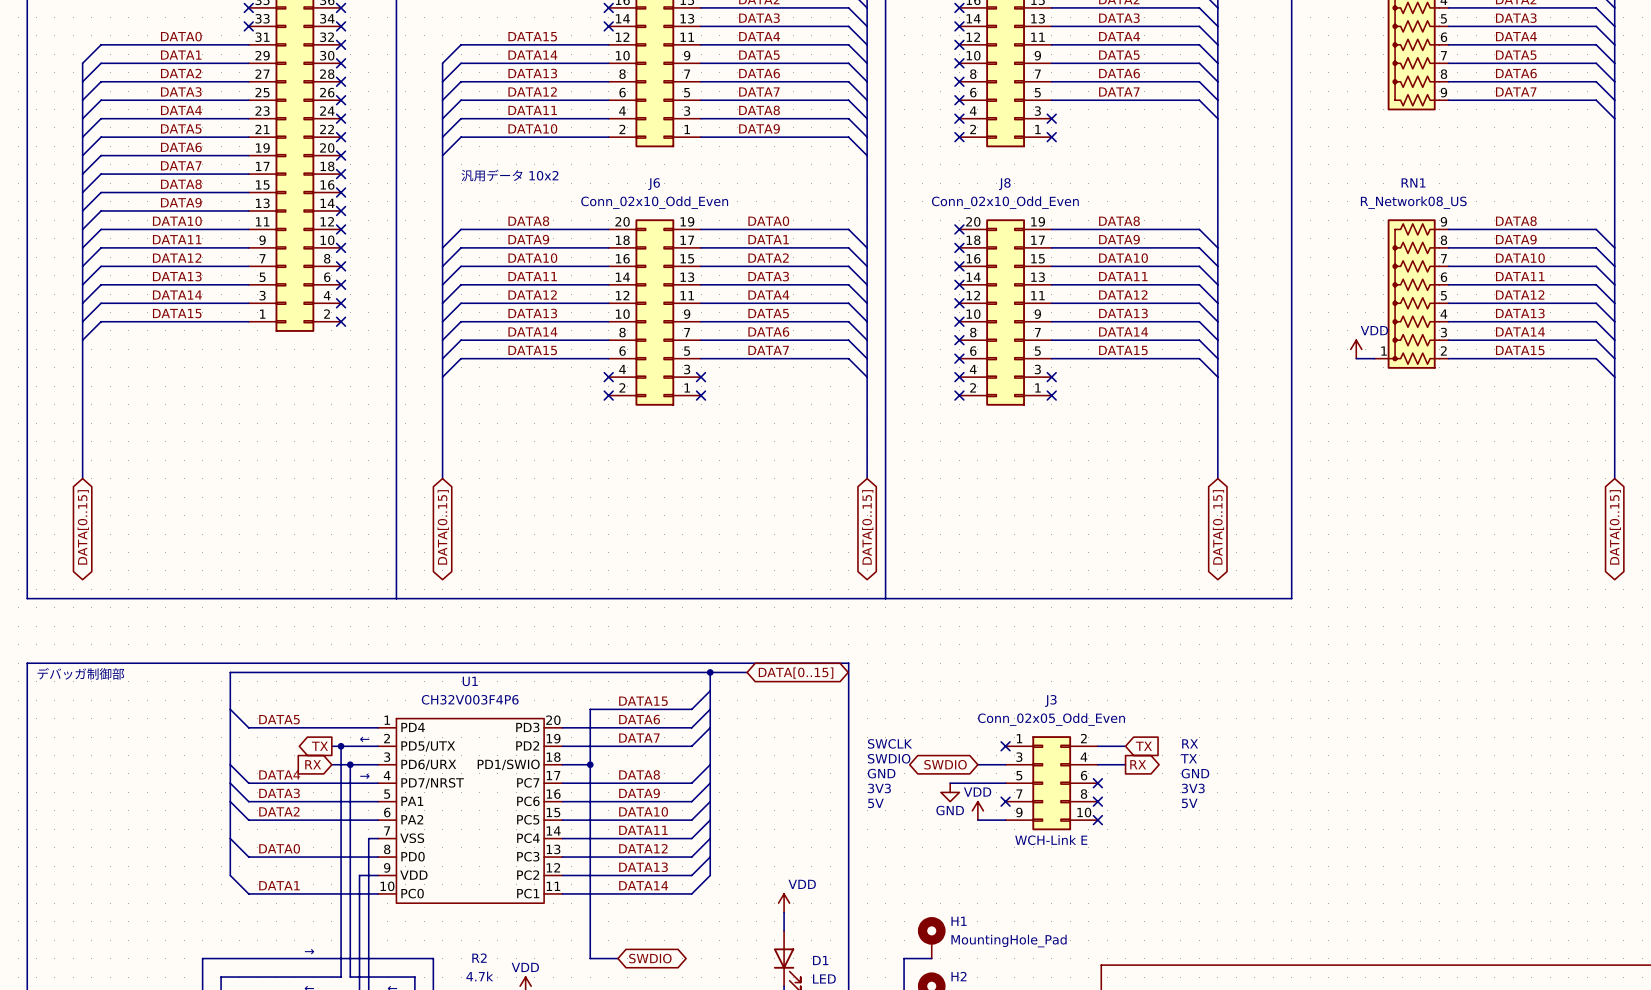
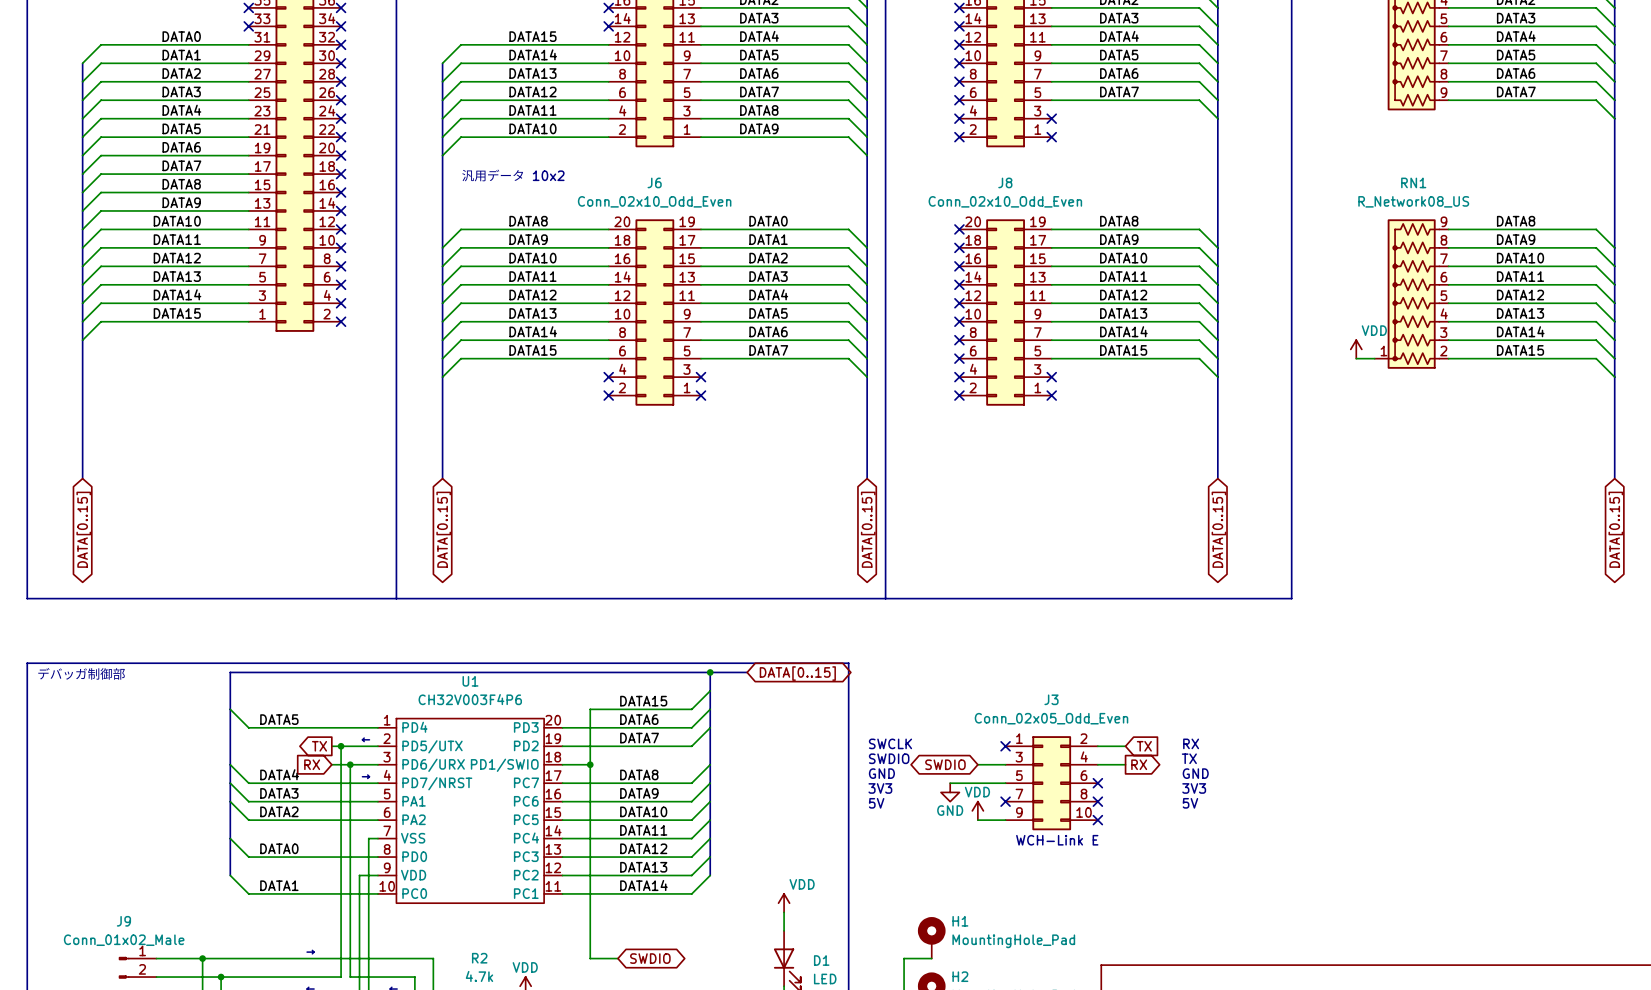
wire: none -> (156, 958) (202, 958)
junction: none -> (202, 958)
J9: none -> Conn_01x02_Male (137, 967)
wire: none -> (156, 977) (221, 977)
junction: none -> (221, 977)

